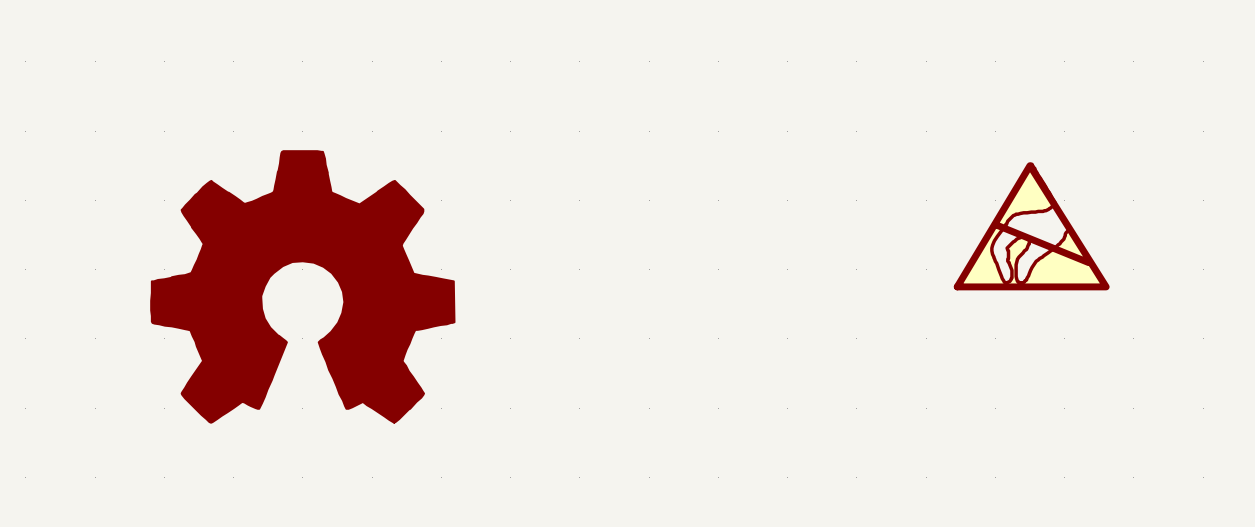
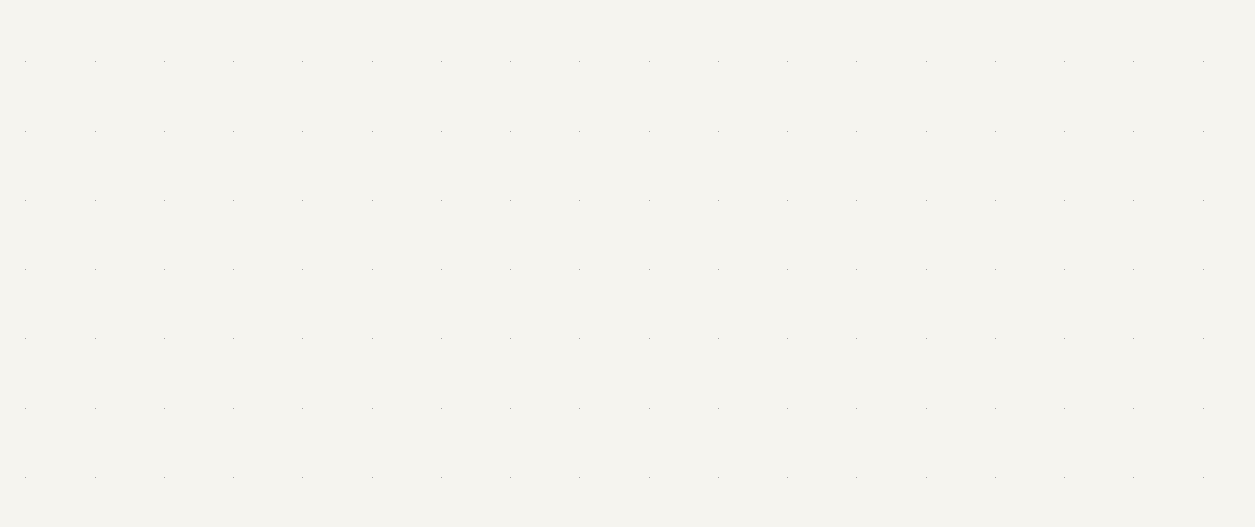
power symbol: (1031, 226) -> none
power symbol: (302, 286) -> none

